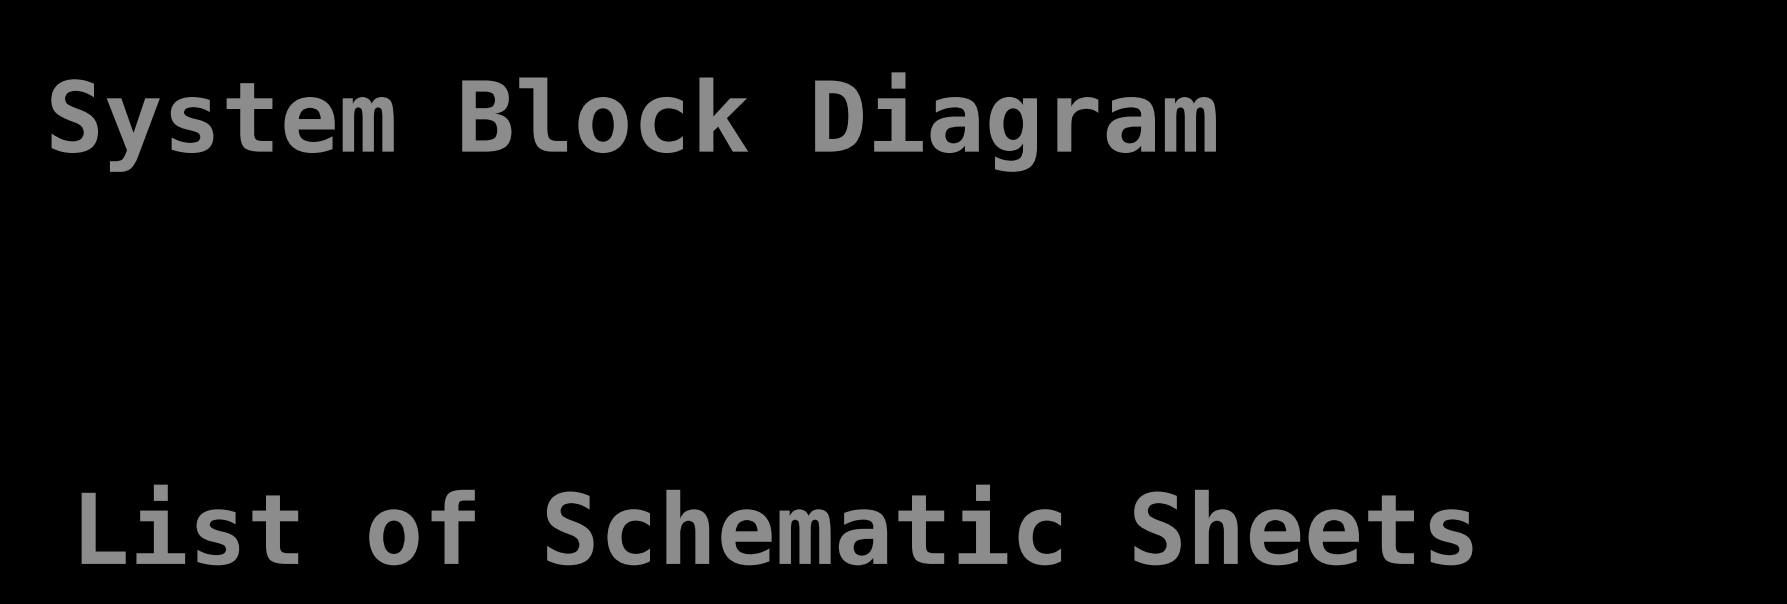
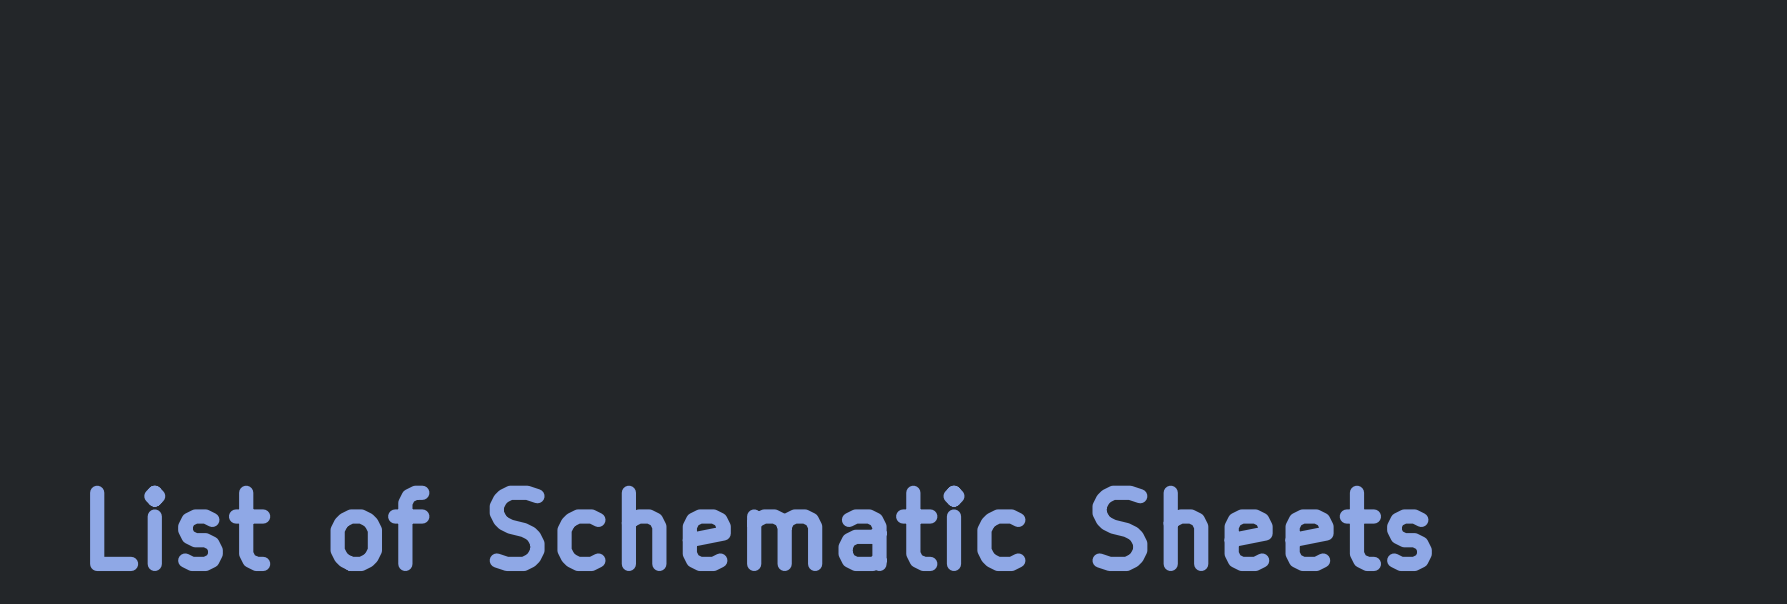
text: System Block Diagram (633, 122) -> none

